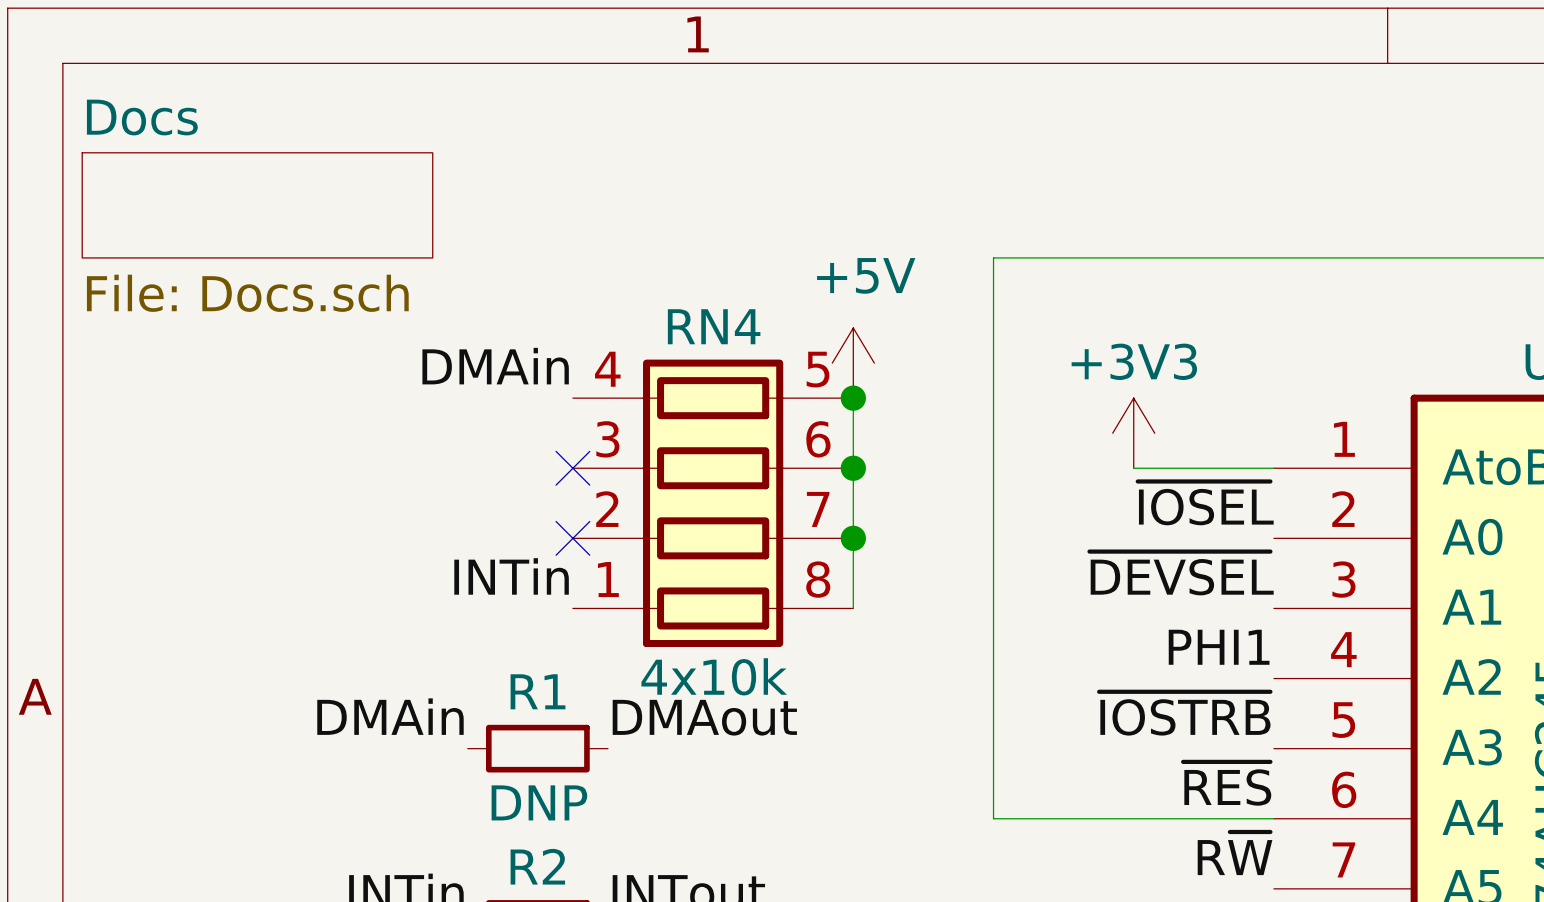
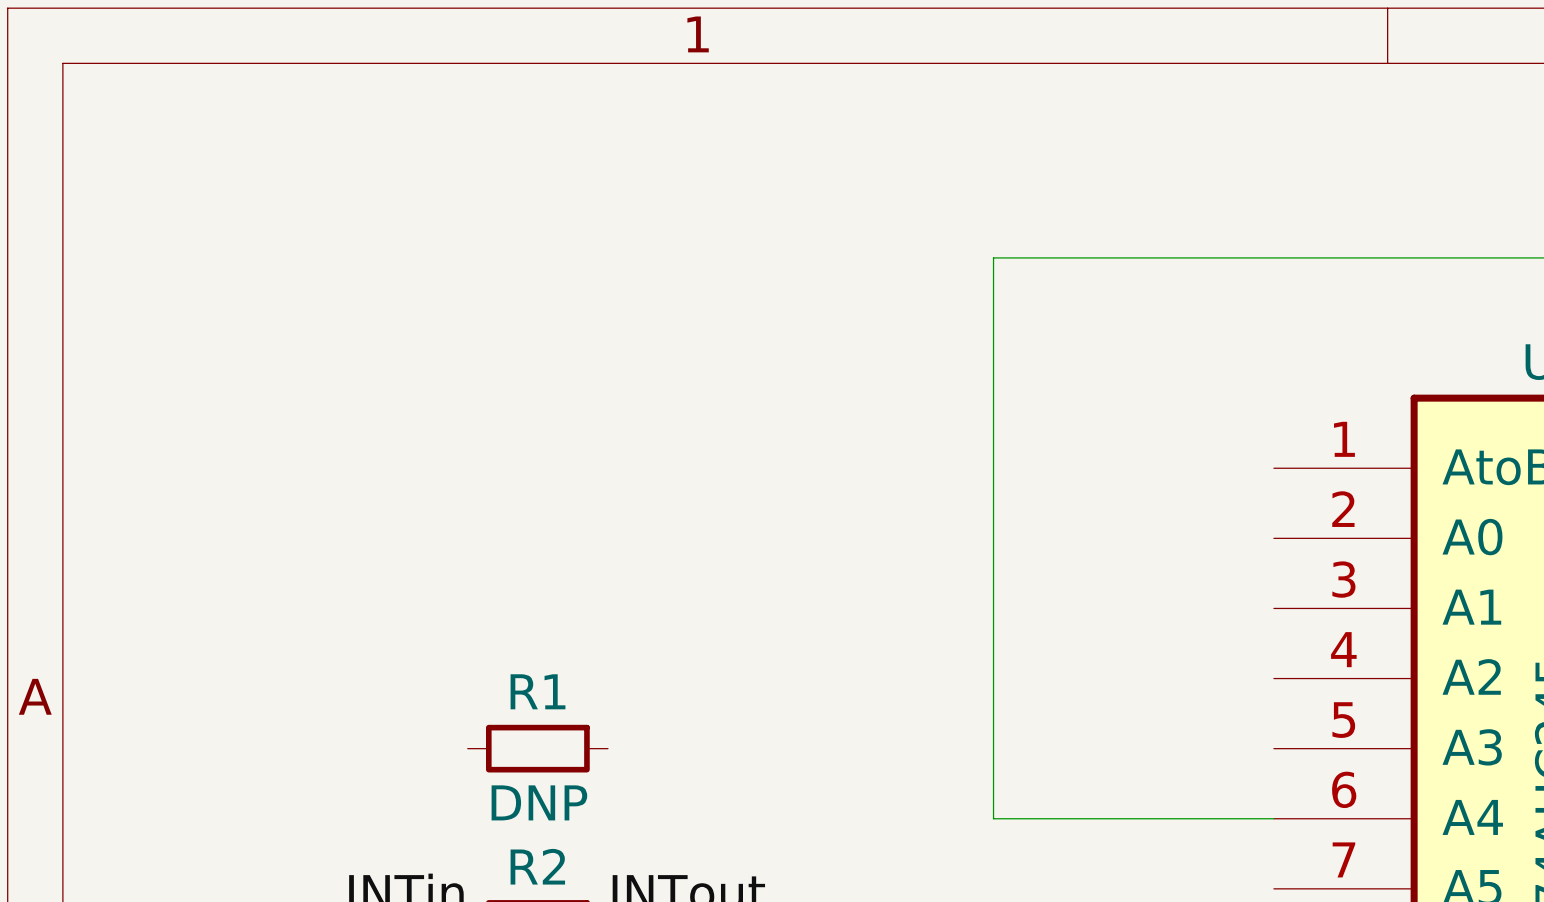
sheet Docs: File: Docs.sch (257, 205) -> none
power symbol: +5V (853, 363) -> none
label: DMAin (495, 366) -> none
wire: (853, 398) (853, 608) -> none
junction: (853, 398) -> none
power symbol: +3V3 (1133, 433) -> none
no-connect mark: (572, 468) -> none
junction: (853, 468) -> none
wire: (1133, 468) (1273, 468) -> none
RN4: 4x10k (713, 503) -> none
label: ~{IOSEL} (1205, 503) -> none
no-connect mark: (572, 538) -> none
junction: (853, 538) -> none
label: ~{DEVSEL} (1181, 573) -> none
label: INTin (511, 576) -> none
label: PHI1 (1219, 647) -> none
label: ~{IOSTRB} (1184, 713) -> none
label: DMAin (390, 716) -> none
label: DMAout (704, 717) -> none
label: ~{RES} (1227, 783) -> none
label: R~{W} (1235, 853) -> none

